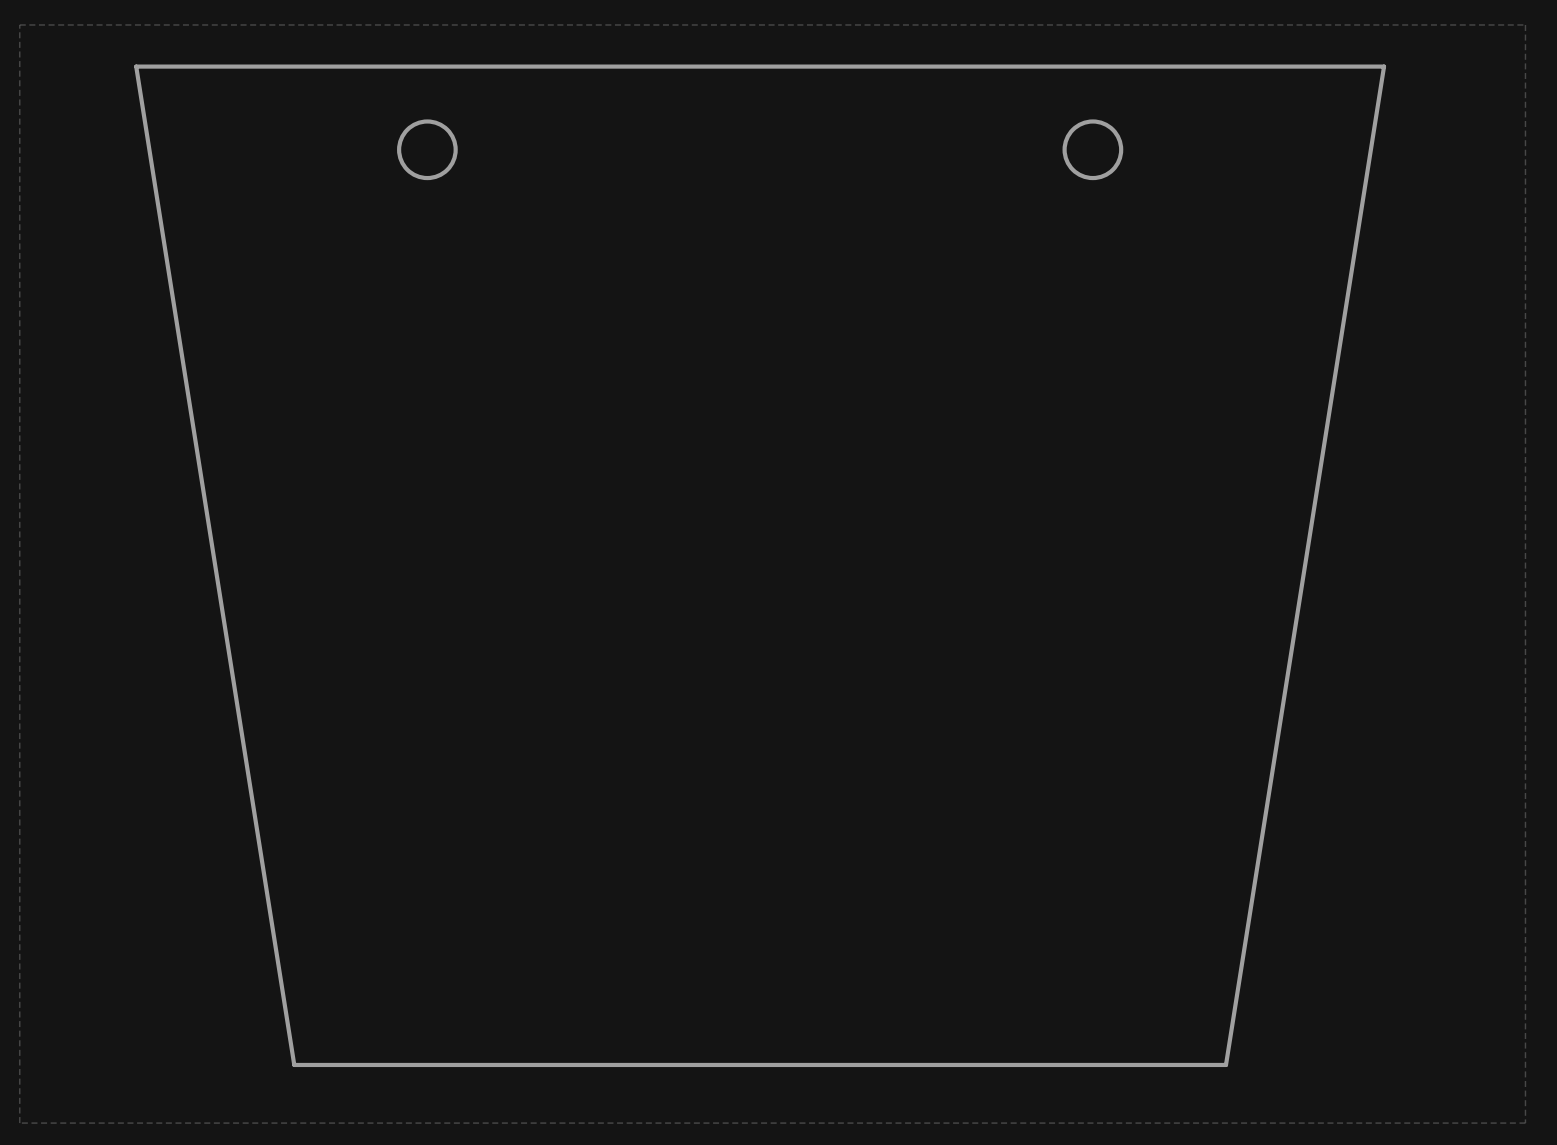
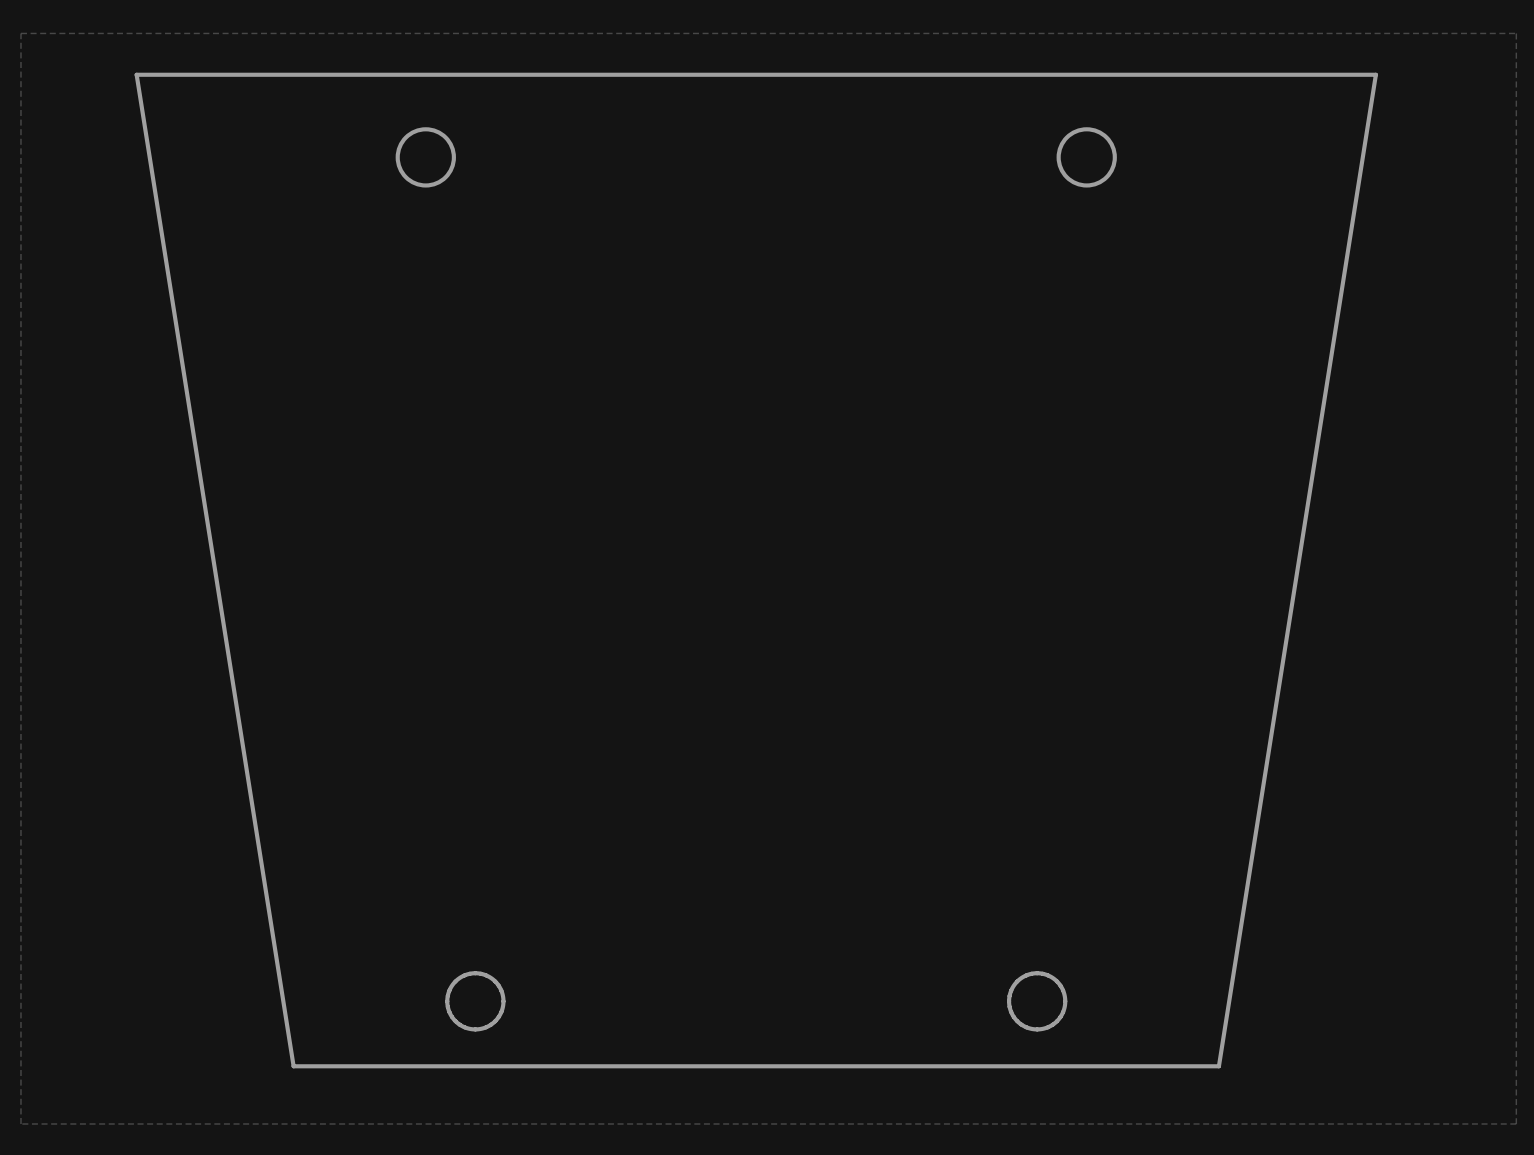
board edge: none -> (475, 973) (464, 975) (455, 981) (449, 990) (447, 1001) (449, 1012) (455, 1021) (464, 1027) (475, 1029) (486, 1027) (495, 1021) (501, 1012) (503, 1001) (501, 990) (495, 981) (486, 975) (475, 973)
board edge: none -> (1037, 973) (1047, 975) (1057, 981) (1063, 990) (1065, 1001) (1063, 1012) (1057, 1021) (1047, 1027) (1037, 1029) (1026, 1027) (1017, 1021) (1011, 1012) (1009, 1001) (1011, 990) (1017, 981) (1026, 975) (1037, 973)

